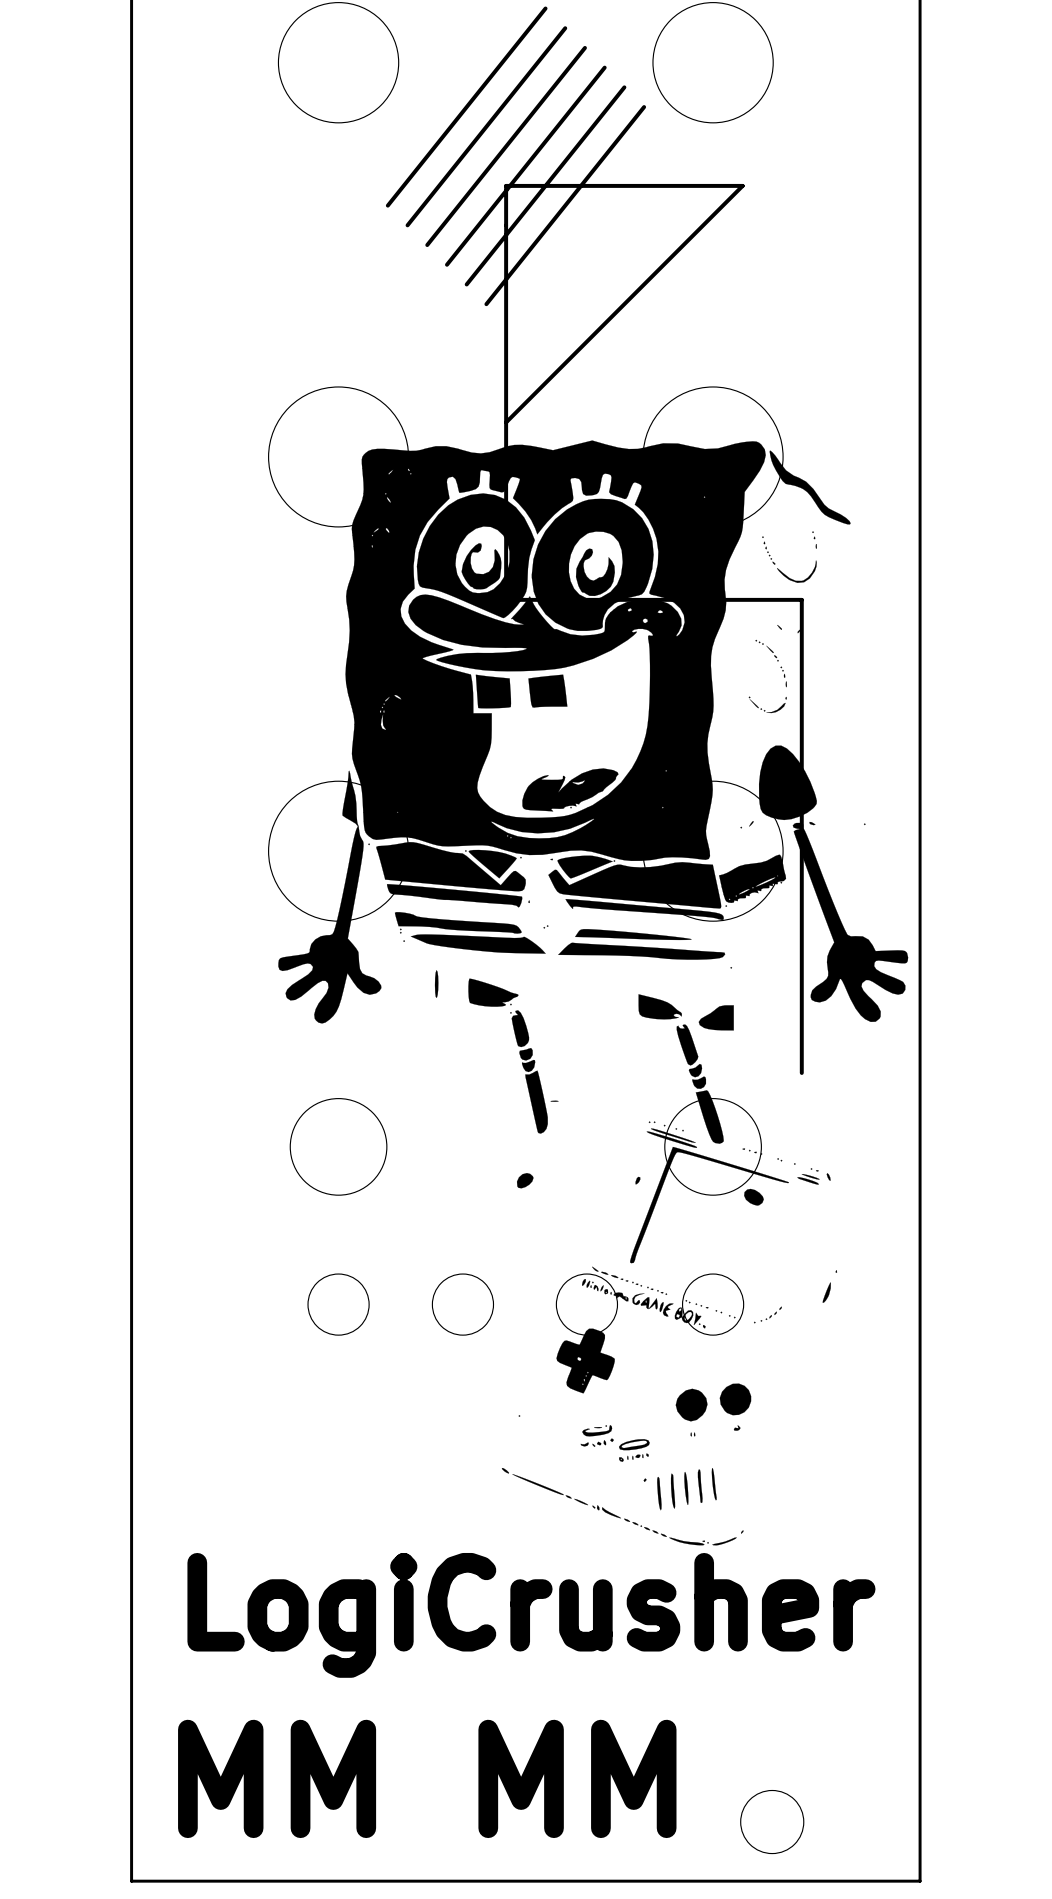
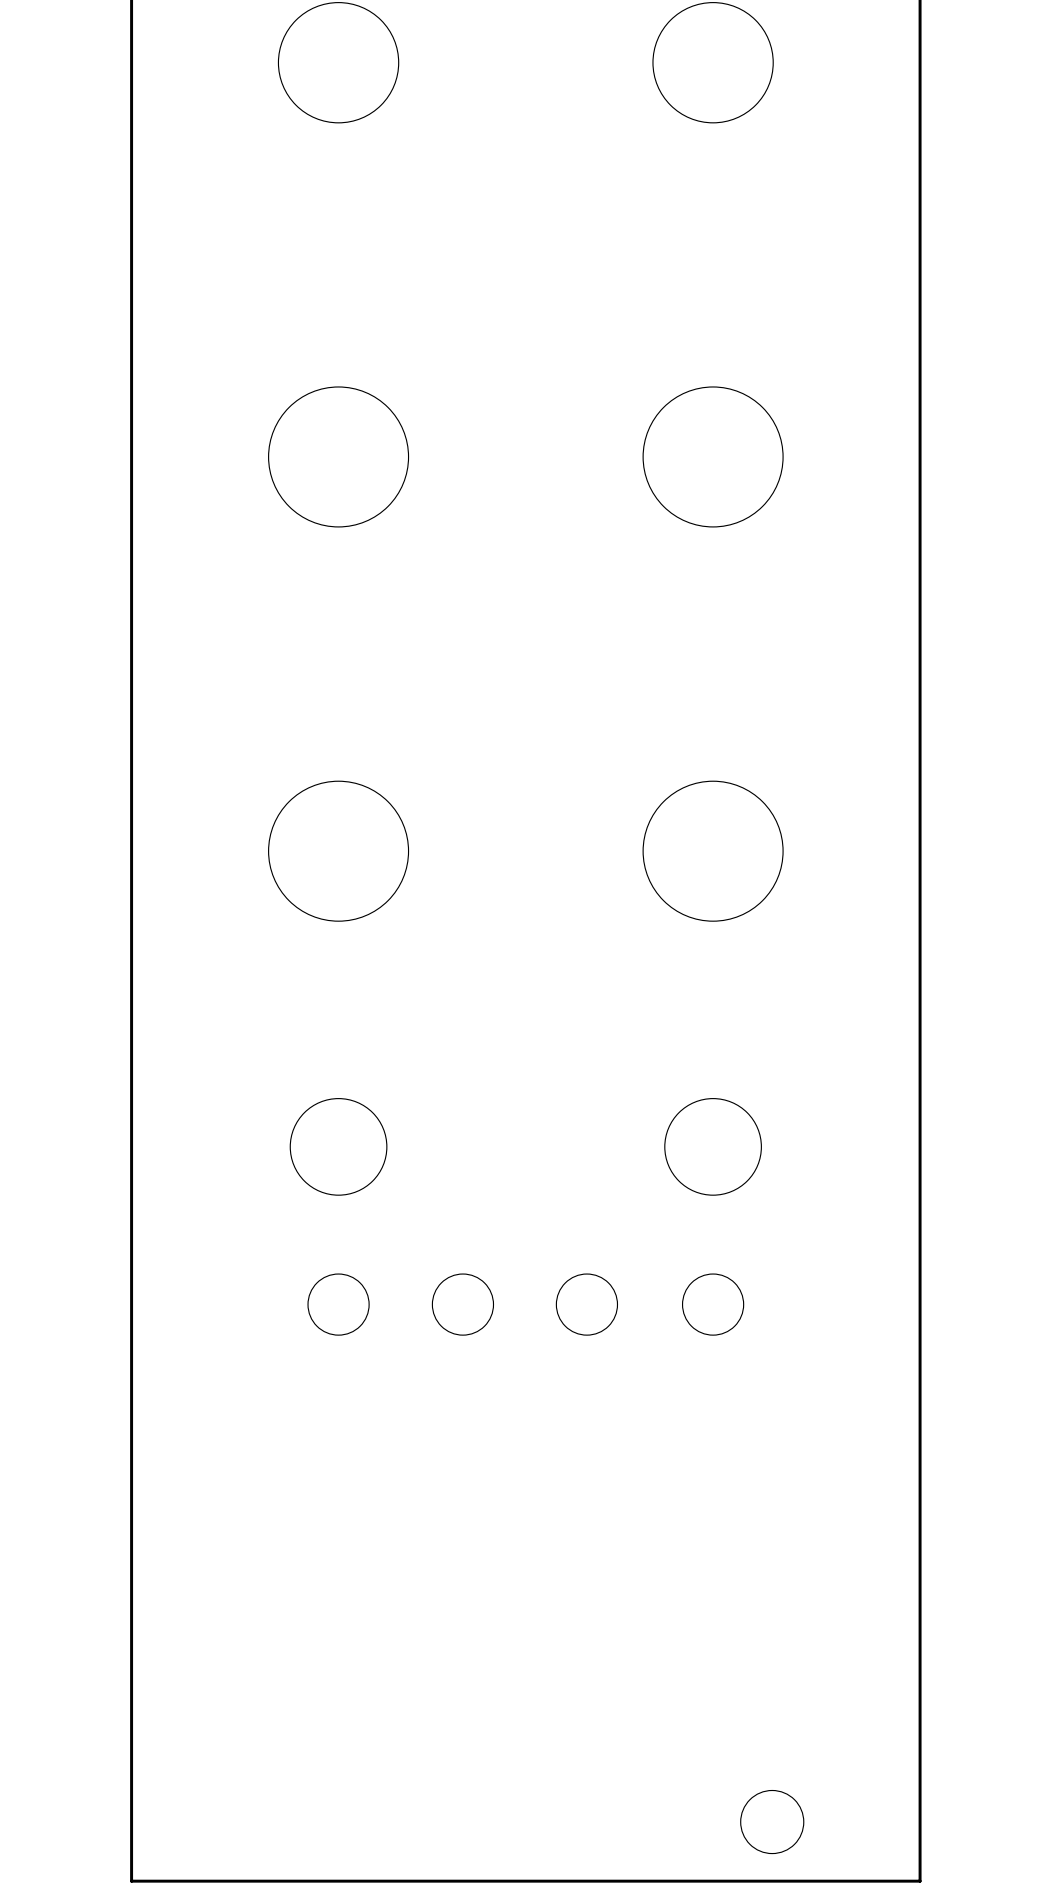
line: (545, 8) (387, 205) -> none
line: (565, 28) (407, 225) -> none
line: (584, 47) (427, 245) -> none
line: (604, 67) (446, 264) -> none
line: (624, 87) (466, 284) -> none
line: (644, 107) (486, 304) -> none
line: (506, 422) (742, 185) (506, 185) (506, 599) (801, 599) (801, 1072) -> none
drawing: [278, 440, 909, 1546] -> none
text: LogiCrusher (531, 1615) -> none
text: MM MM (427, 1778) -> none

